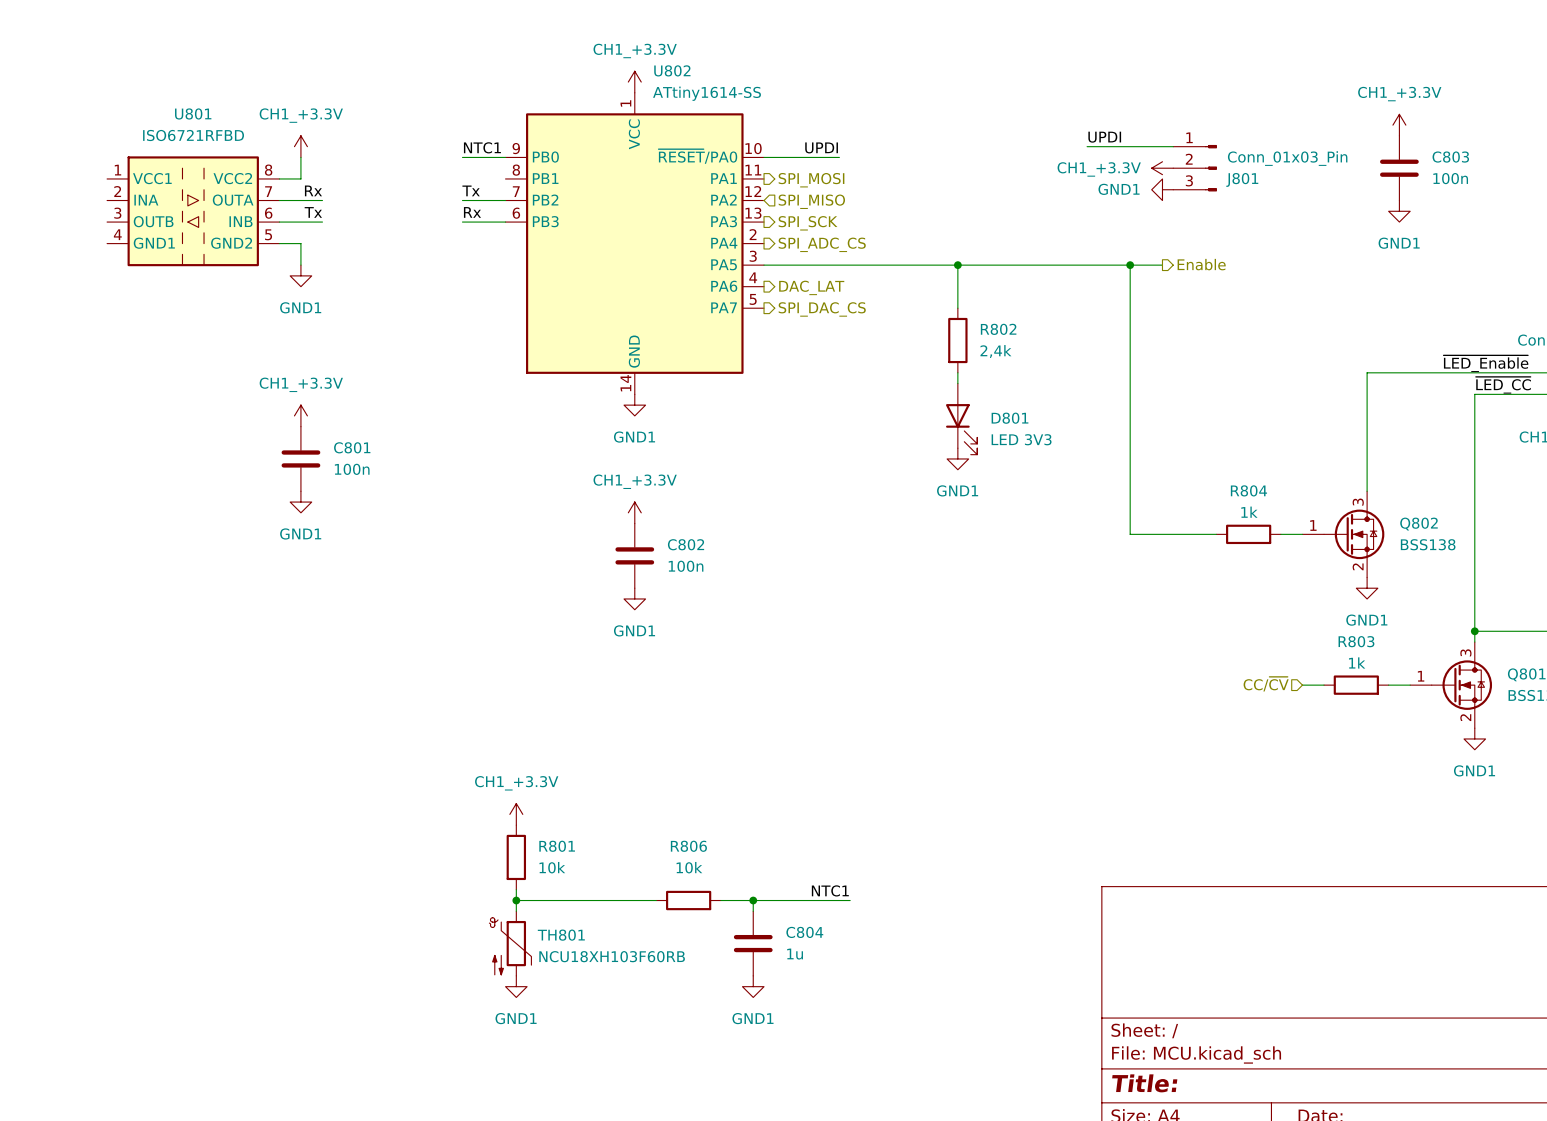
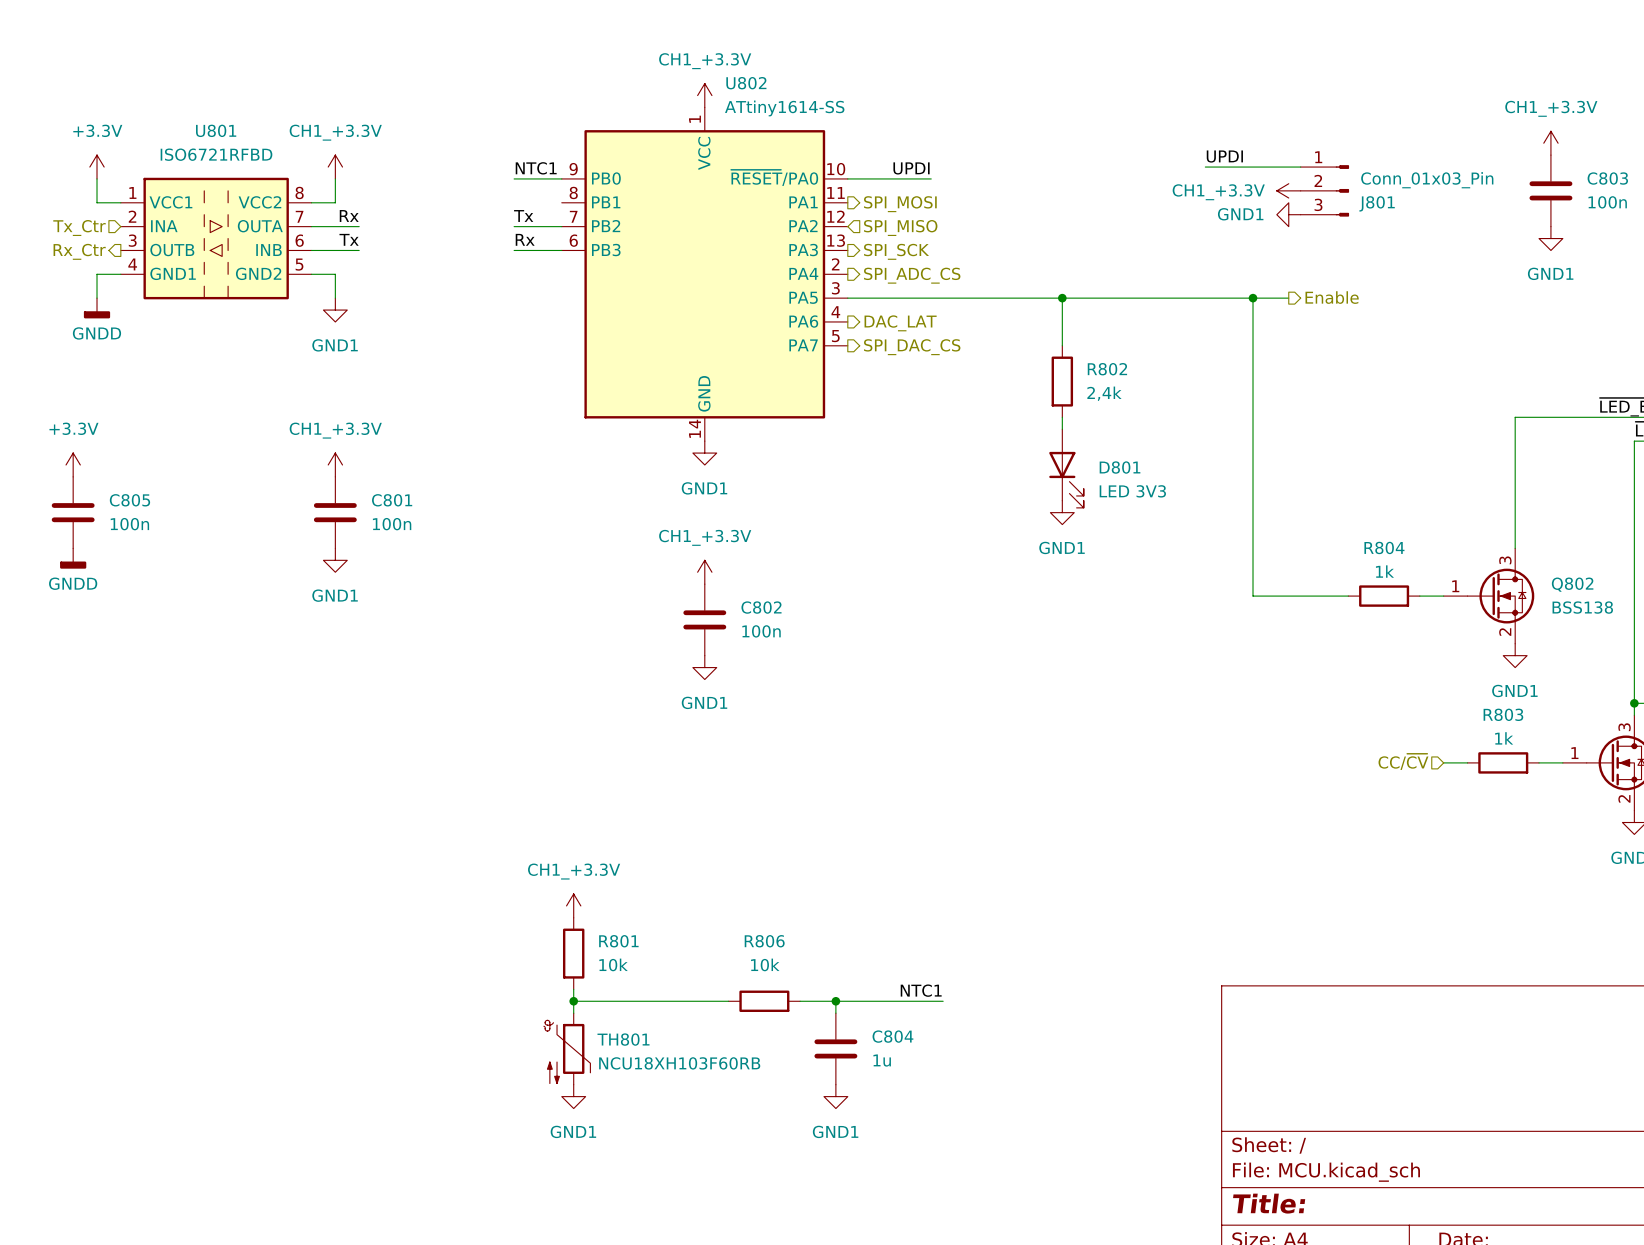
power symbol: none -> +3.3V (97, 167)
wire: none -> (97, 178) (97, 202) (120, 202)
hierarchical label: none -> Tx_Ctr (79, 228)
hierarchical label: none -> Rx_Ctr (79, 251)
wire: none -> (120, 274) (97, 274) (97, 298)
power symbol: none -> GNDD (97, 308)
power symbol: none -> +3.3V (73, 464)
C805: none -> 100n (73, 512)
power symbol: none -> GNDD (73, 558)

